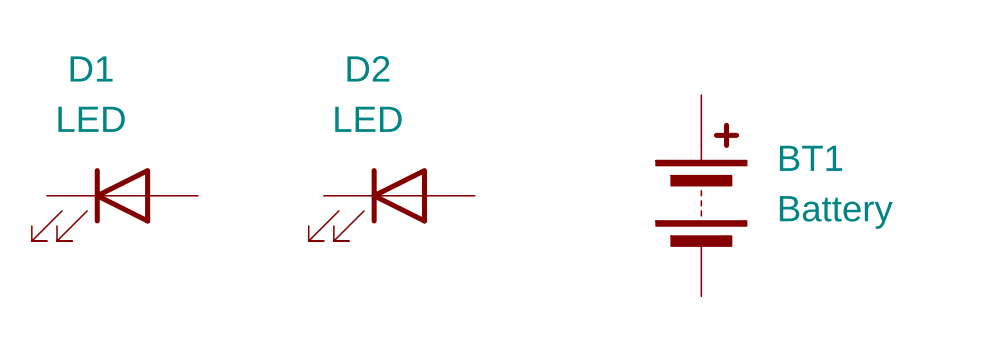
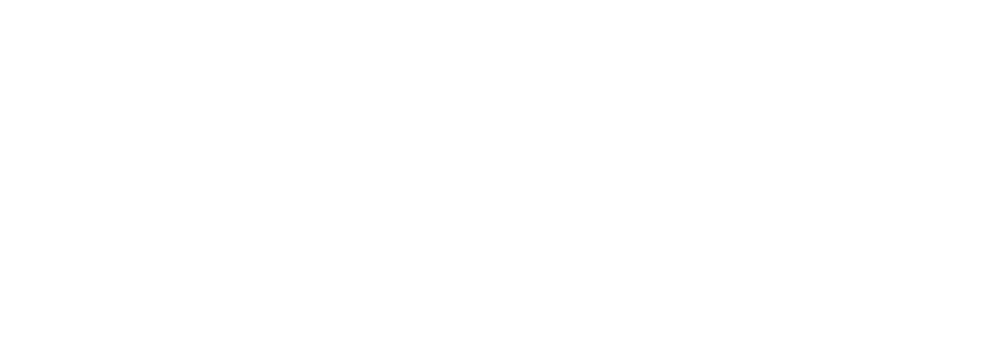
BT1: Battery (701, 195) -> none
D1: LED (114, 204) -> none
D2: LED (391, 204) -> none

